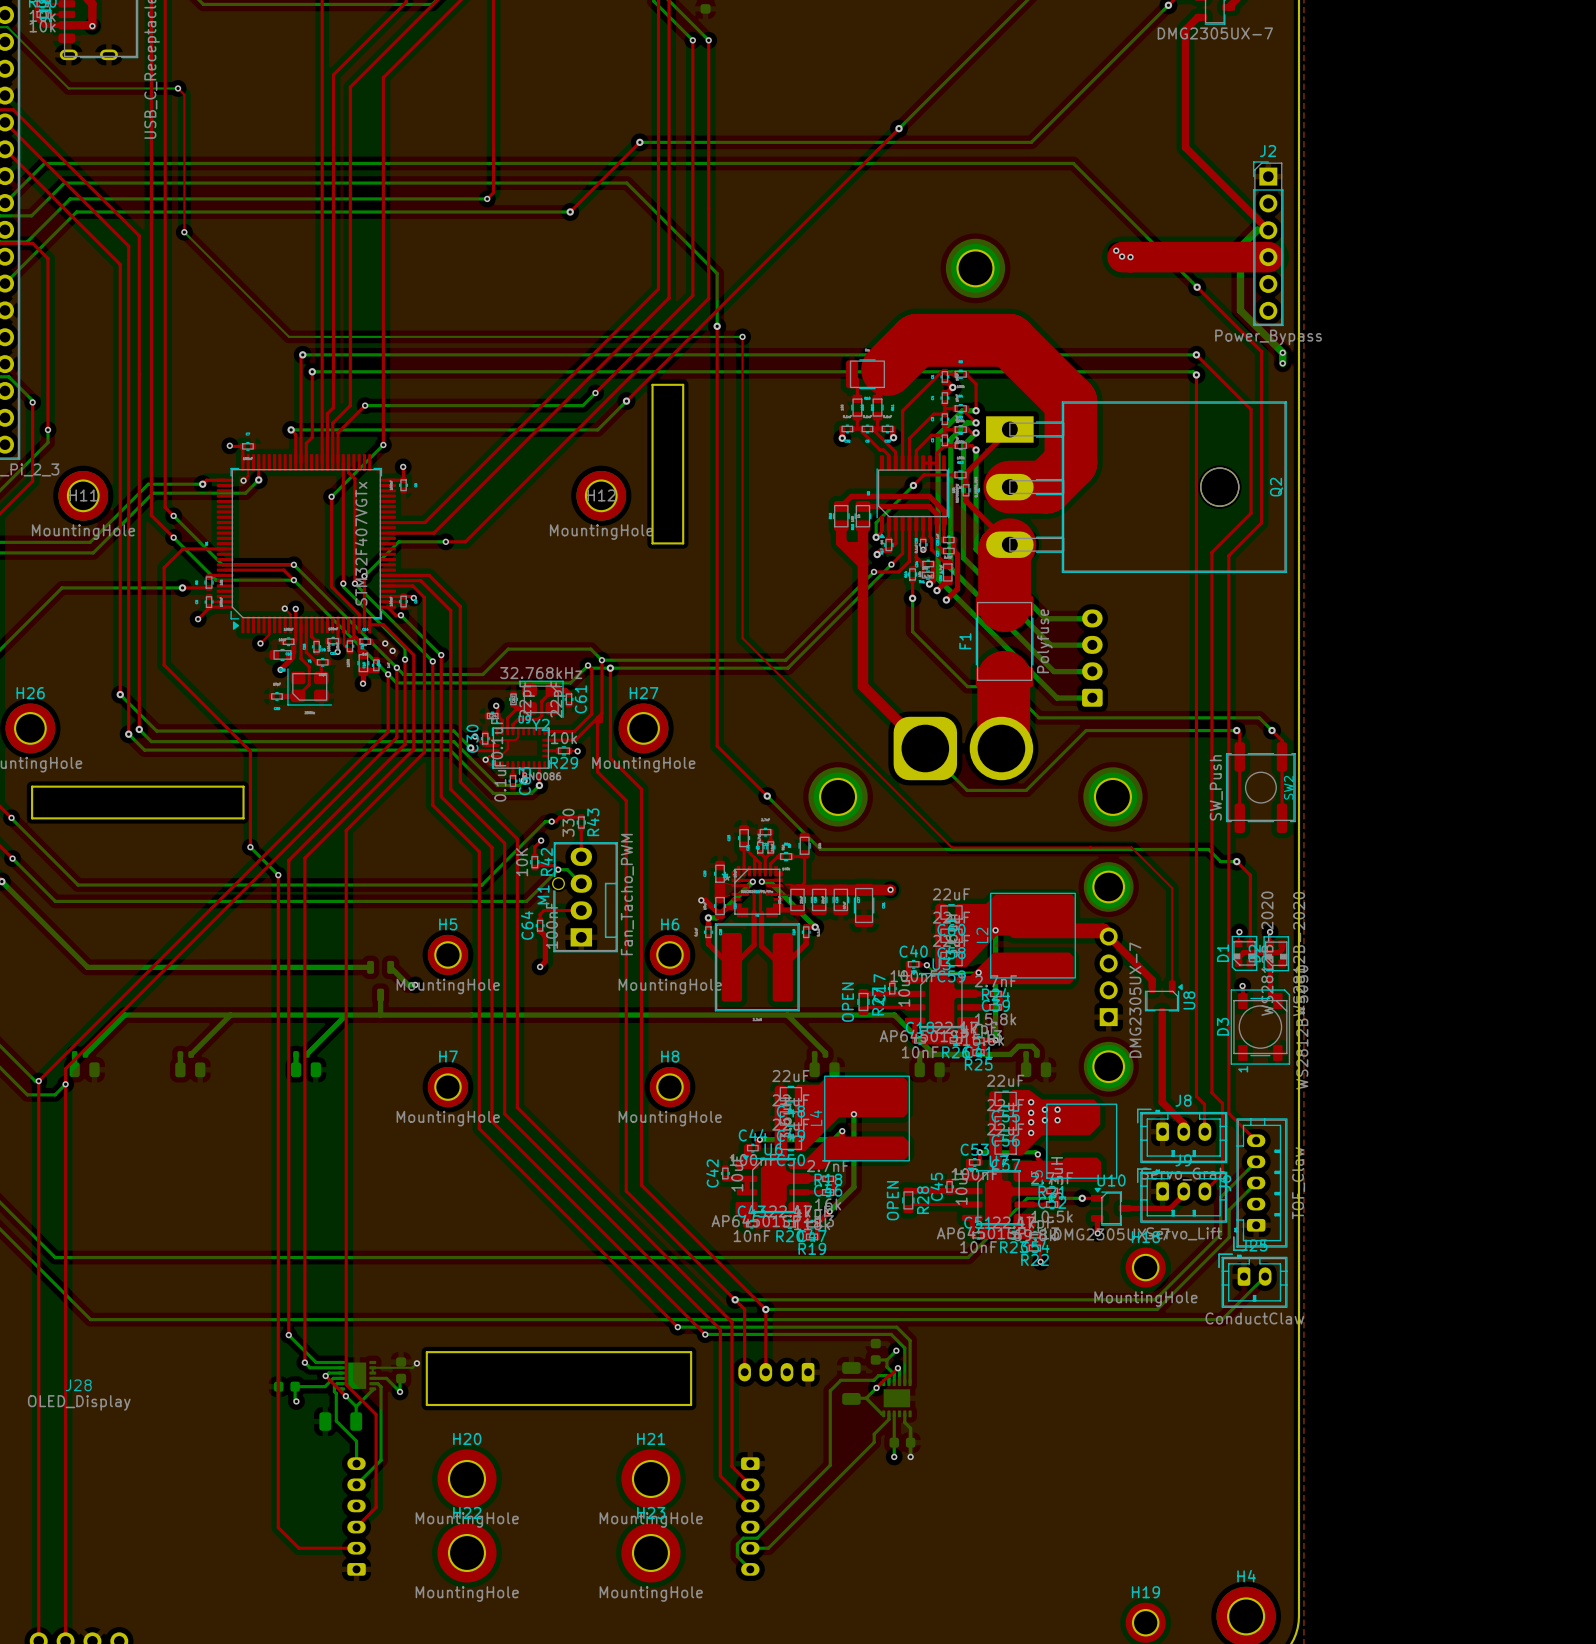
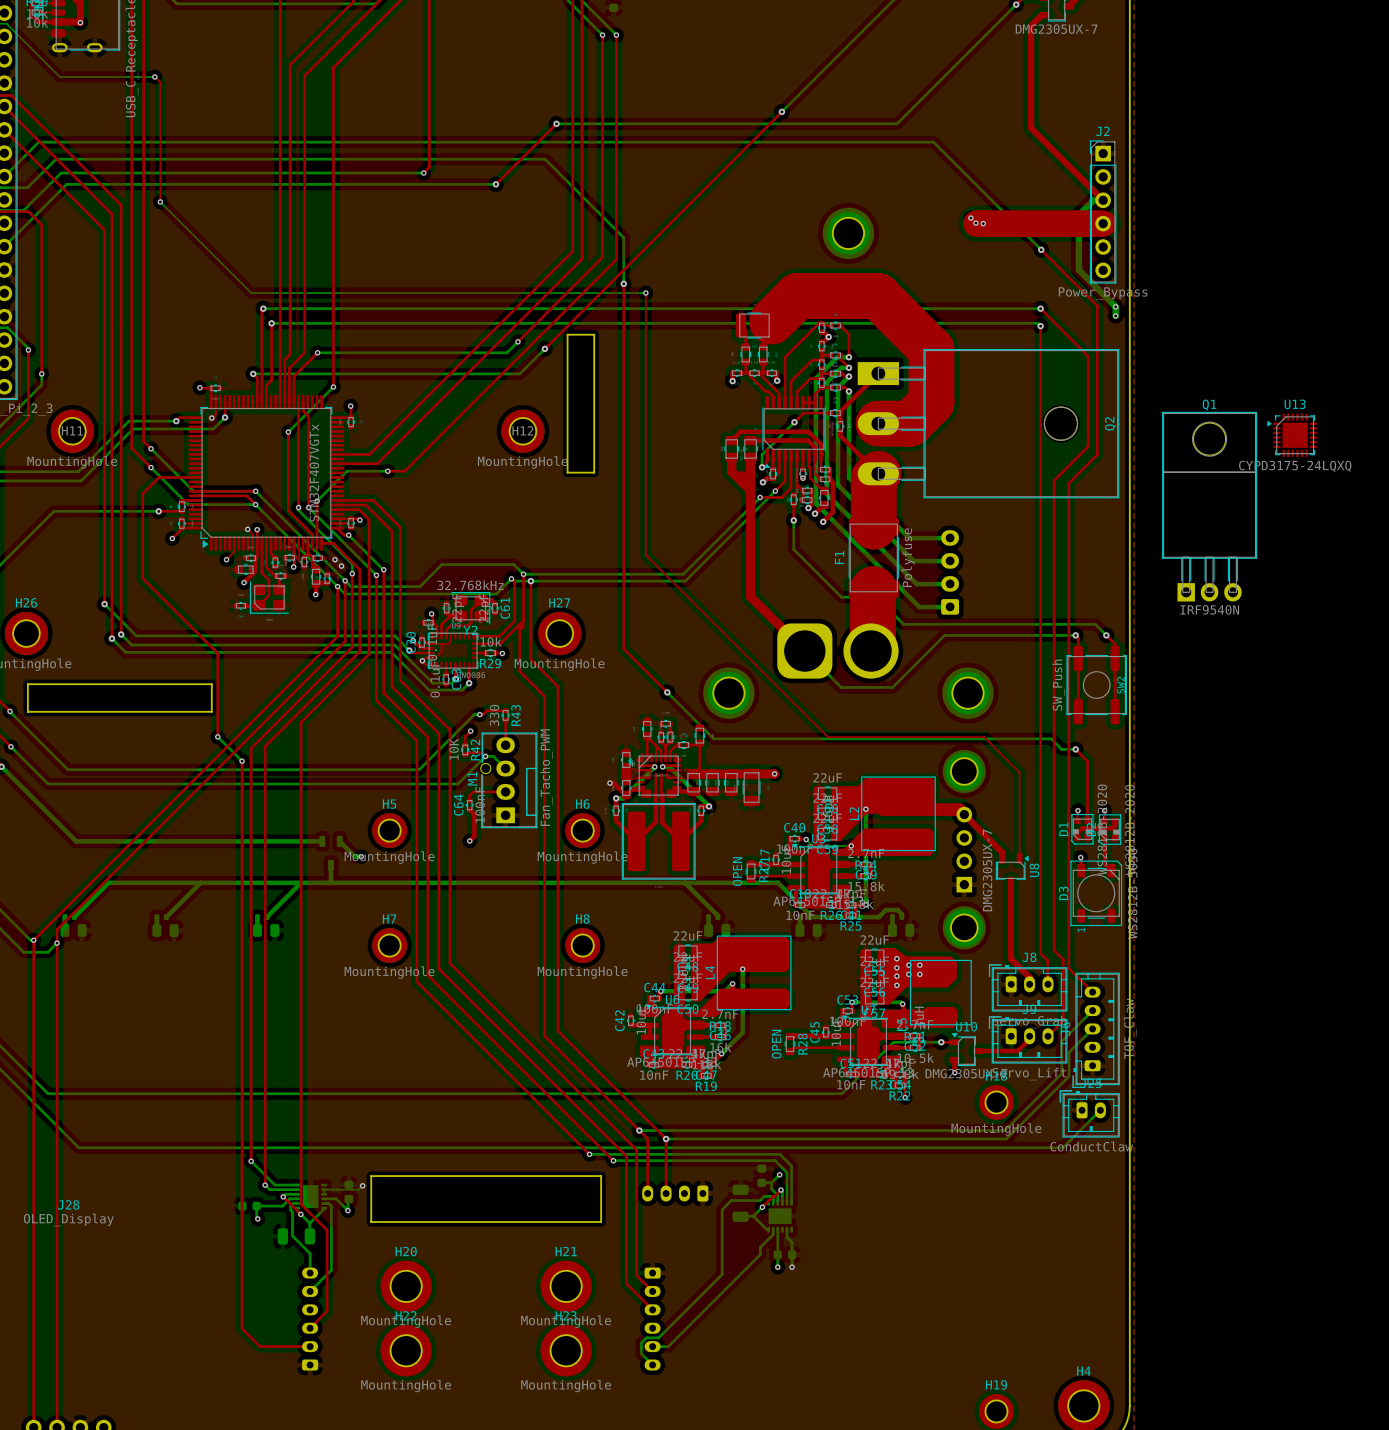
U13: none -> CYPD3175-24LQXQ (1292, 435)
Q1: none -> IRF9540N (1209, 506)

